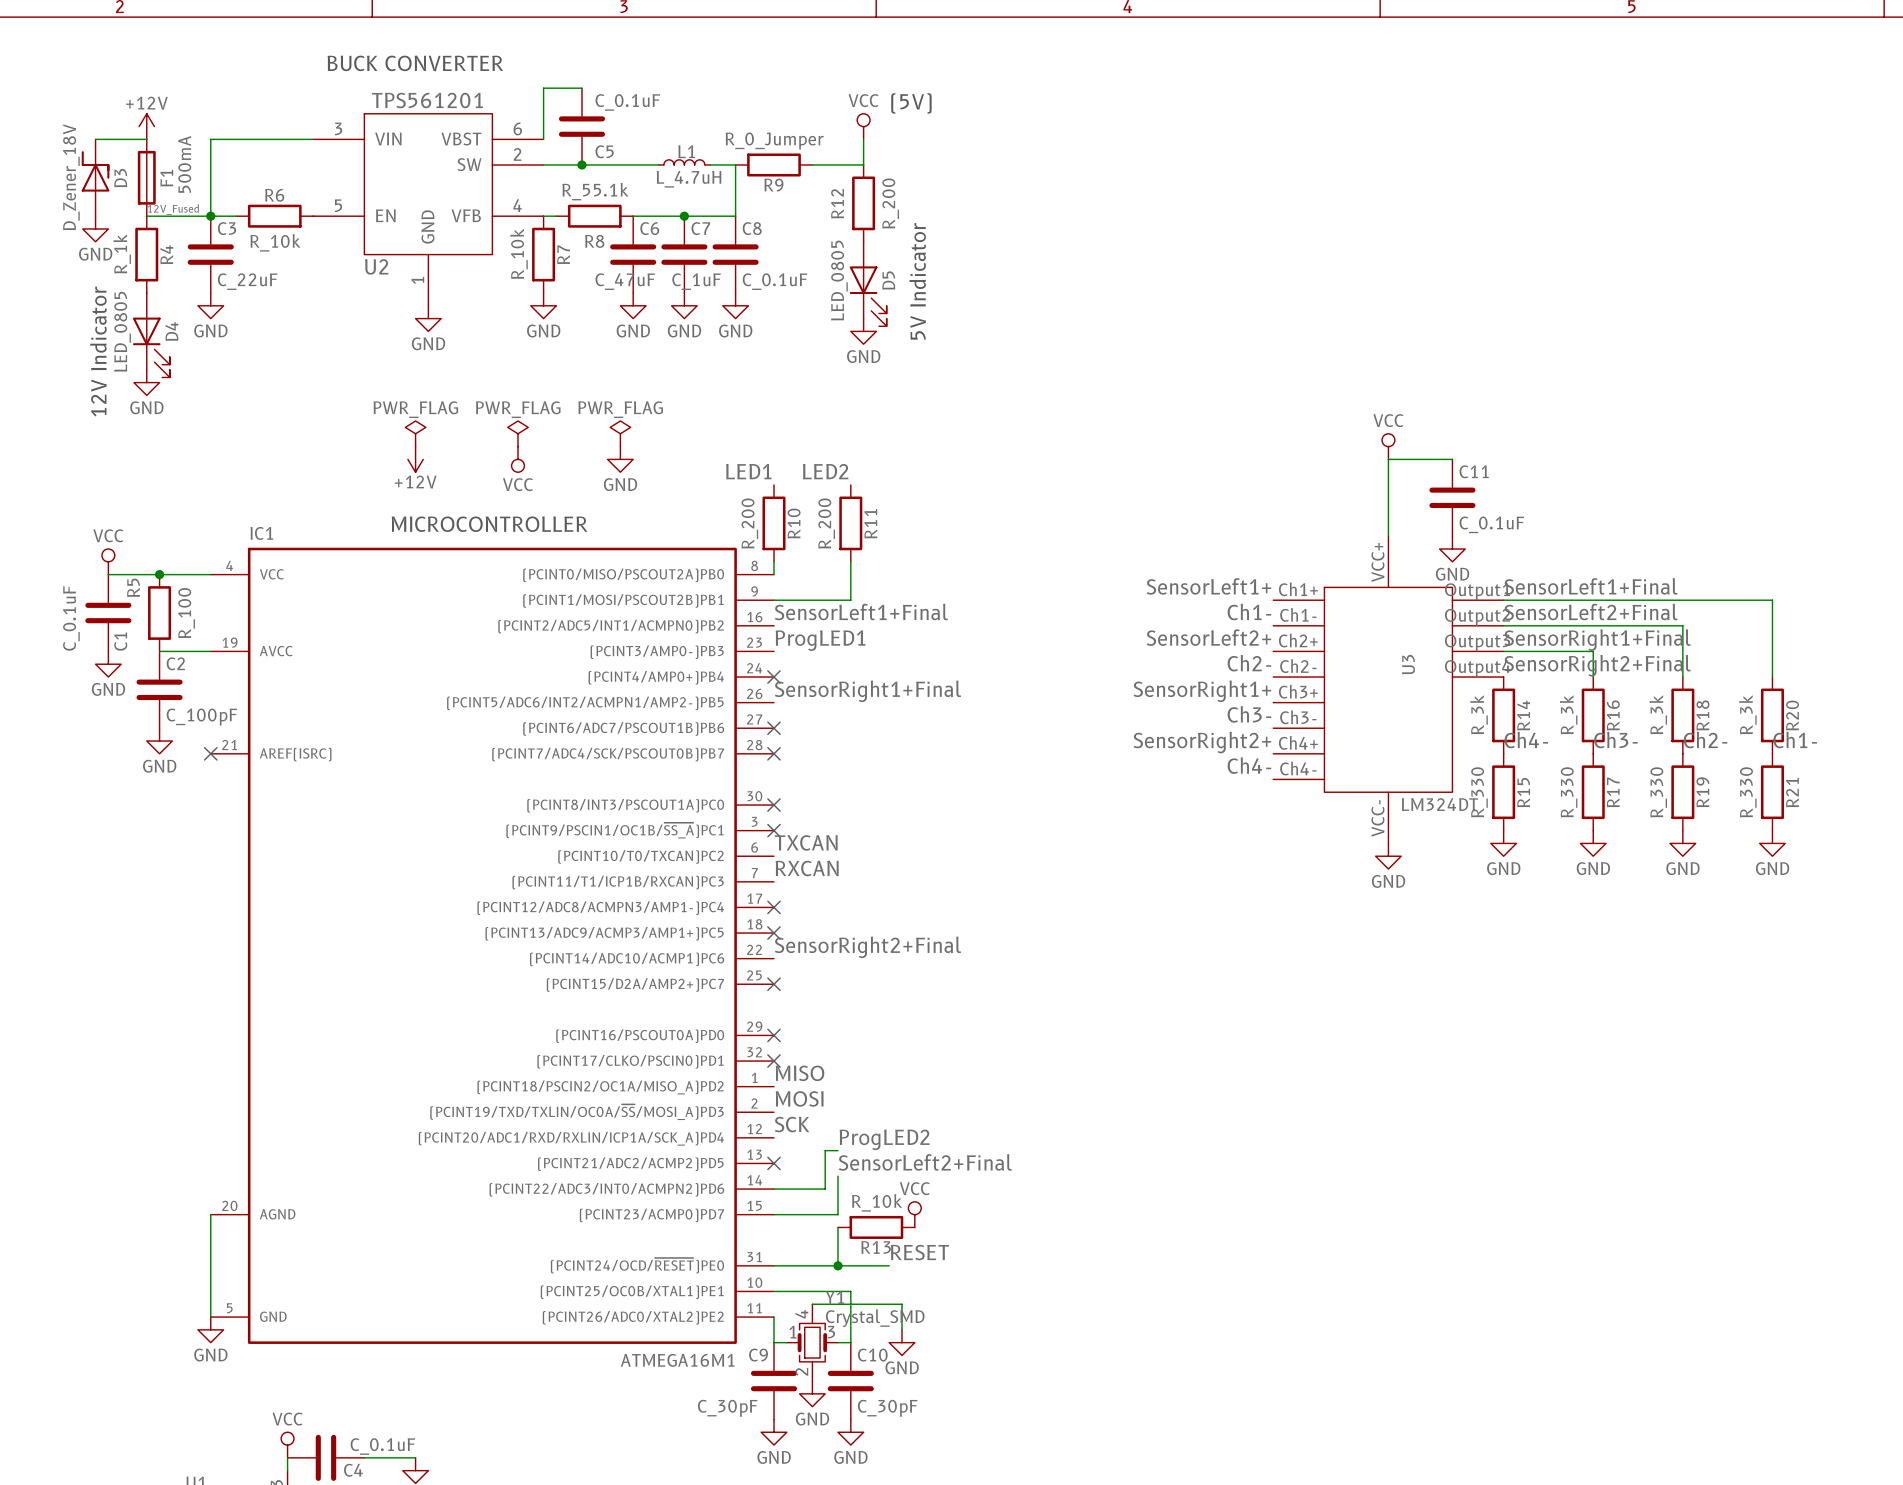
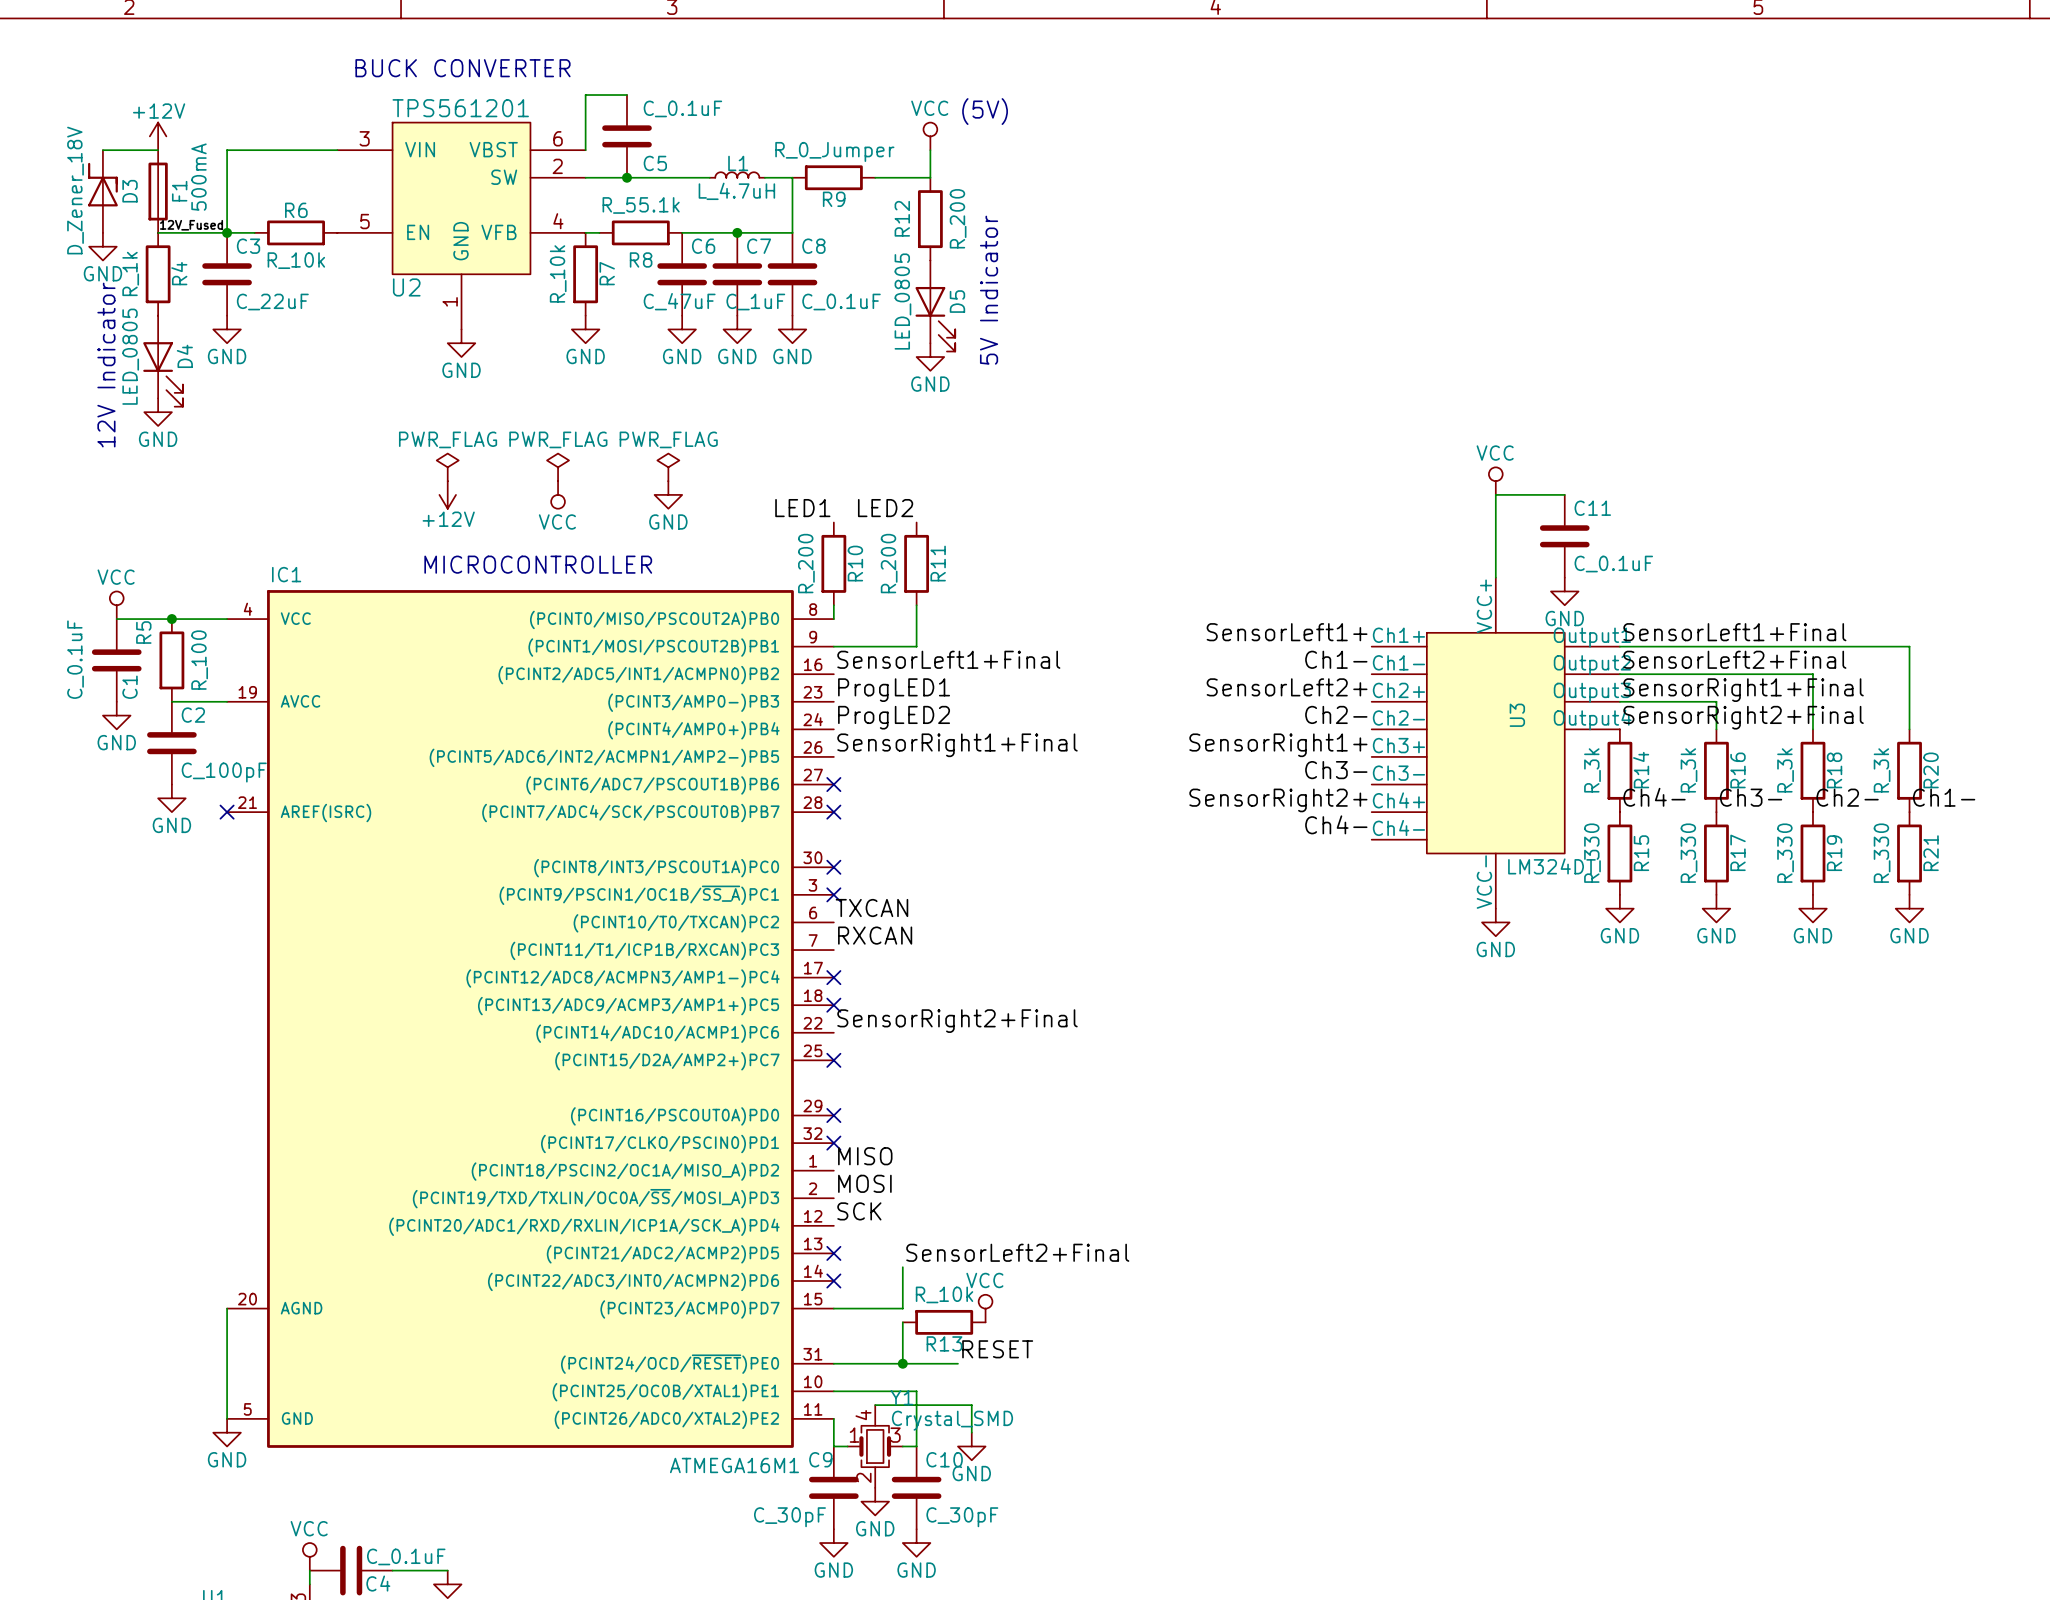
label: none -> ProgLED2 (894, 717)
no-connect mark: (774, 677) -> none
label: ProgLED2 (884, 1139) -> none
wire: (838, 1150) (825, 1150) (825, 1189) (774, 1189) -> none
no-connect mark: none -> (833, 1280)

